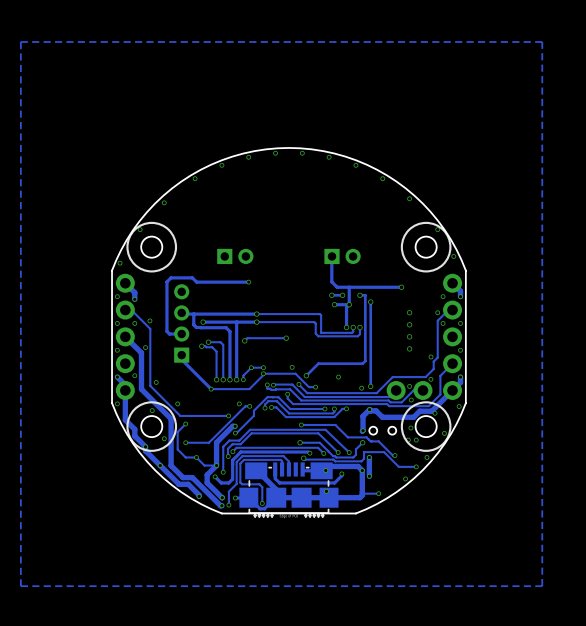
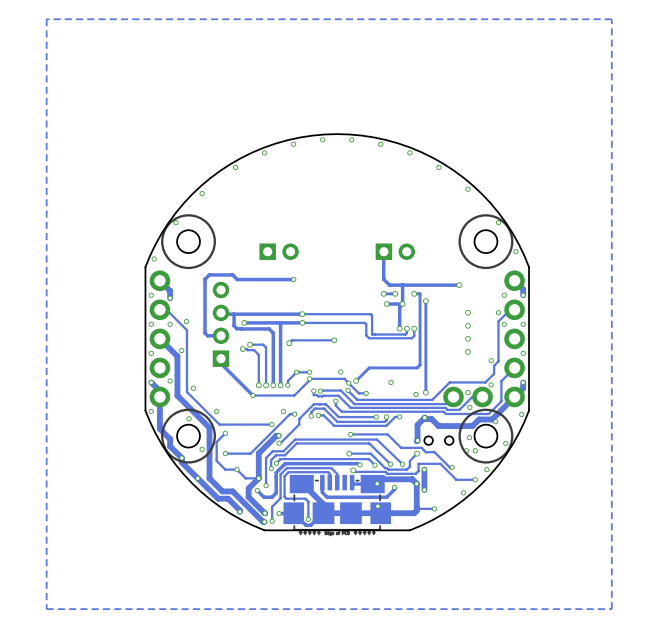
via: none -> (348, 383)

